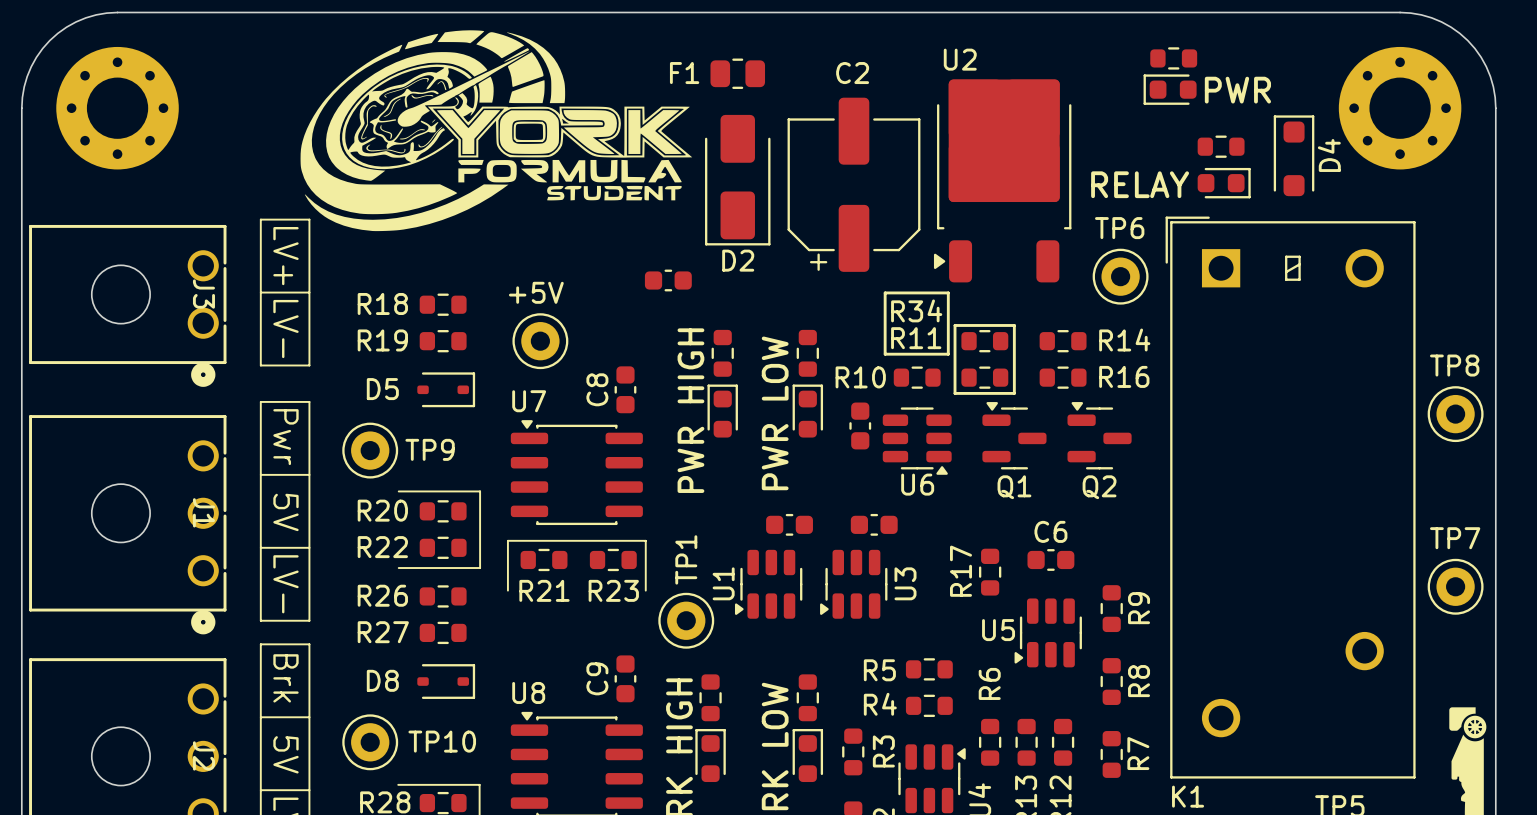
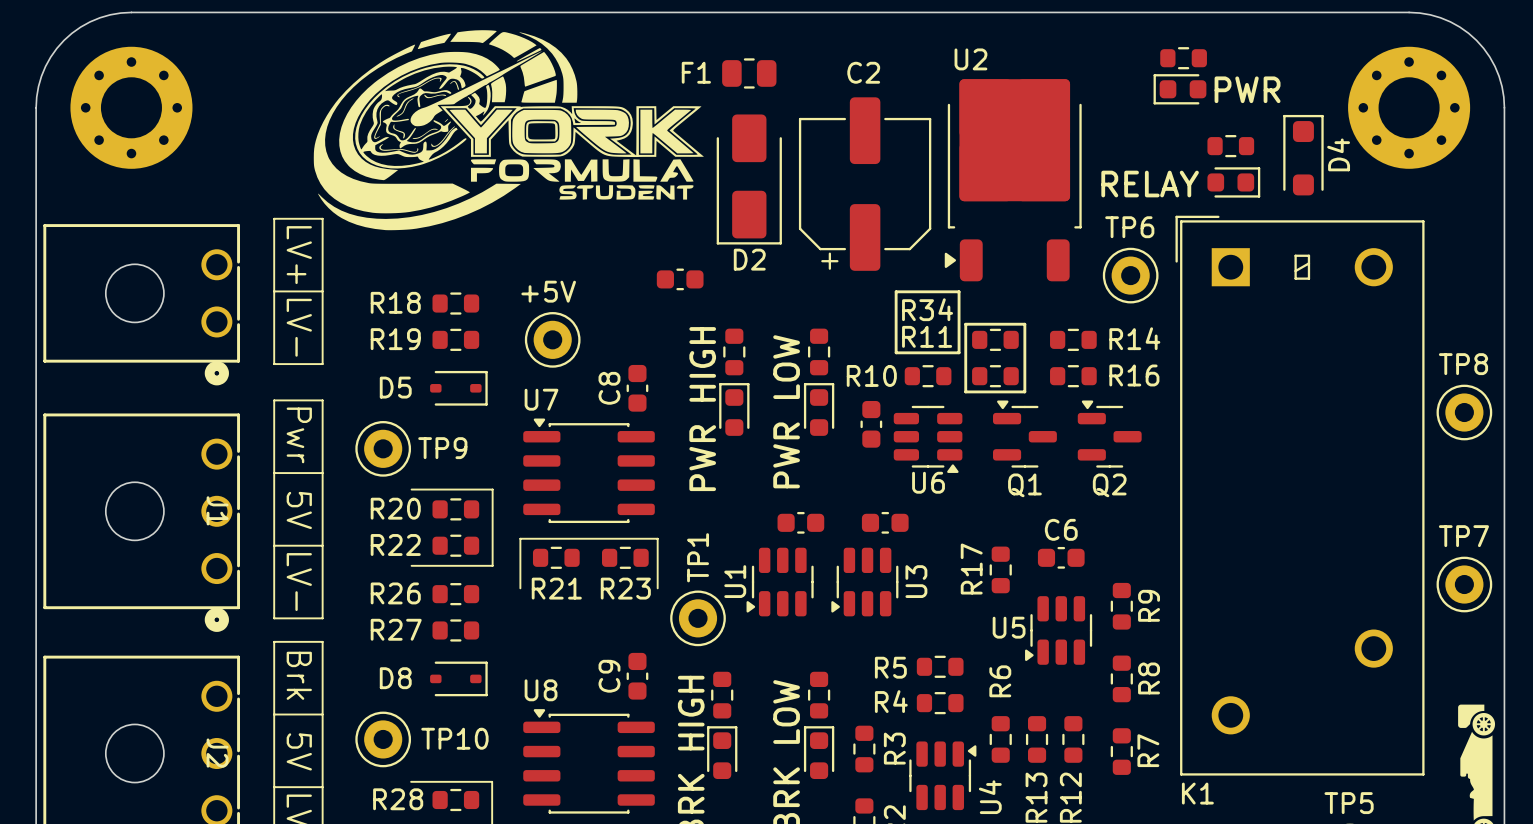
J3 name: J3 (203, 294) -> none

